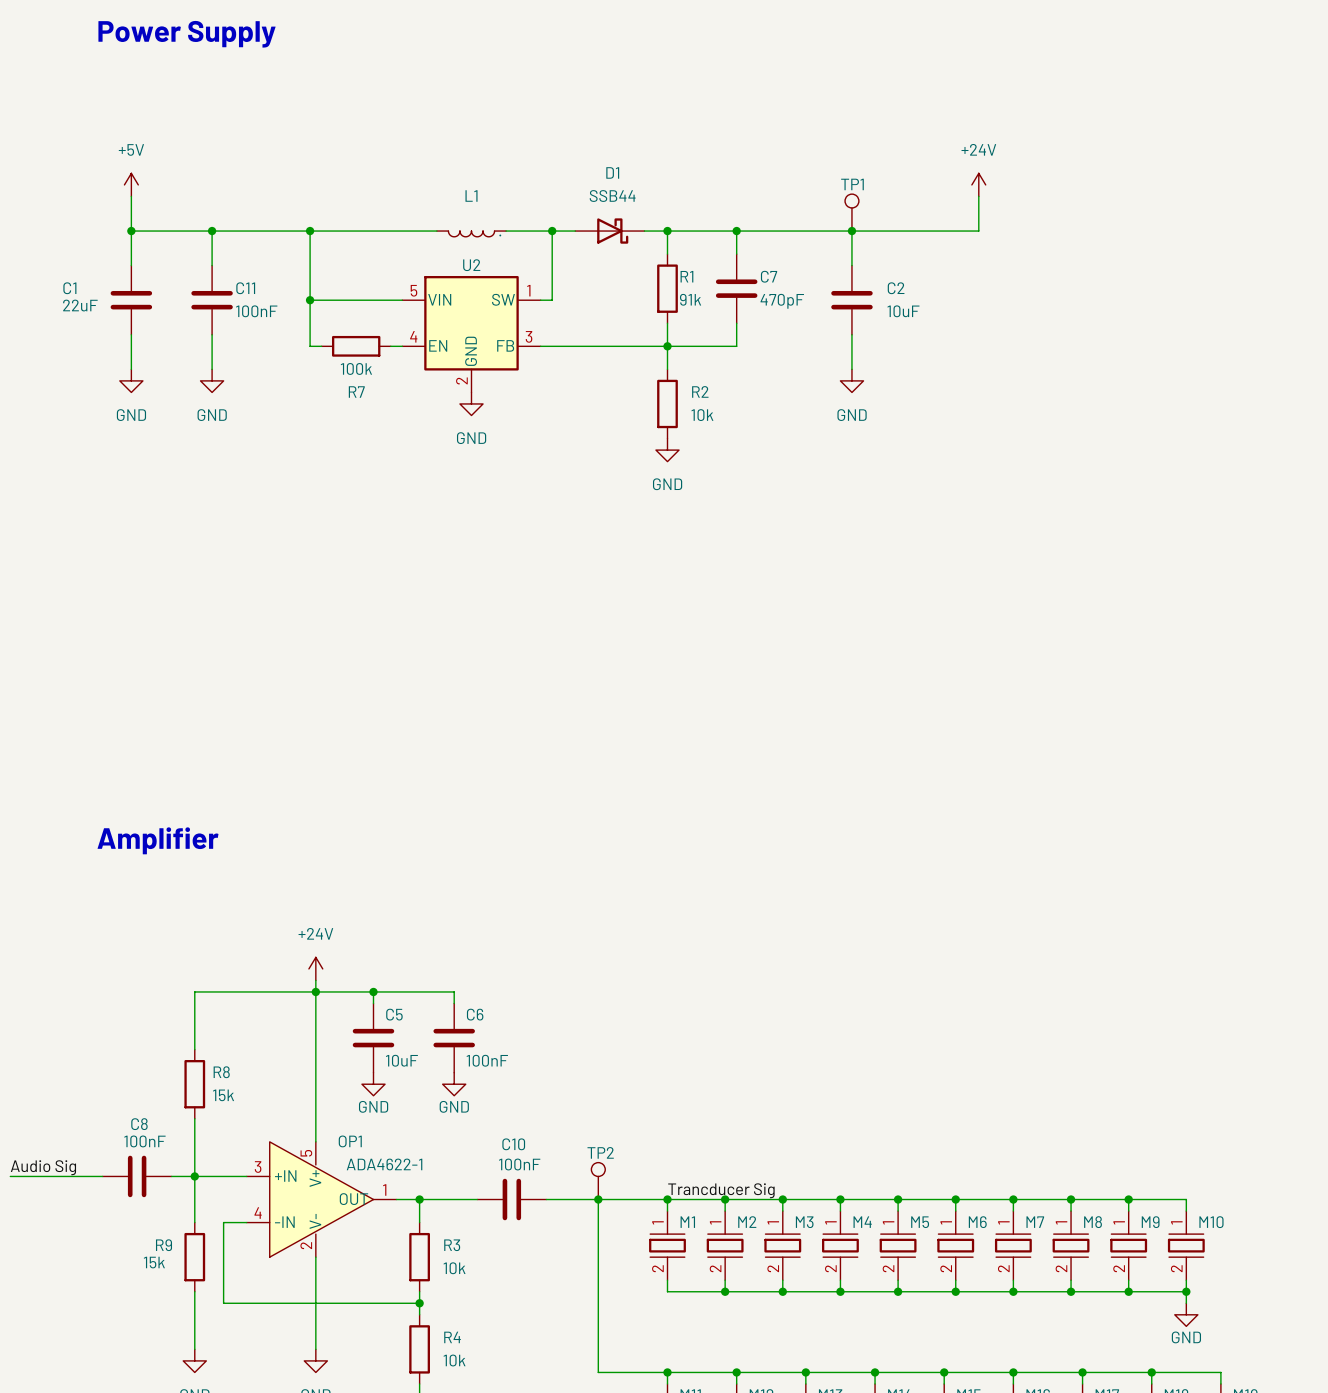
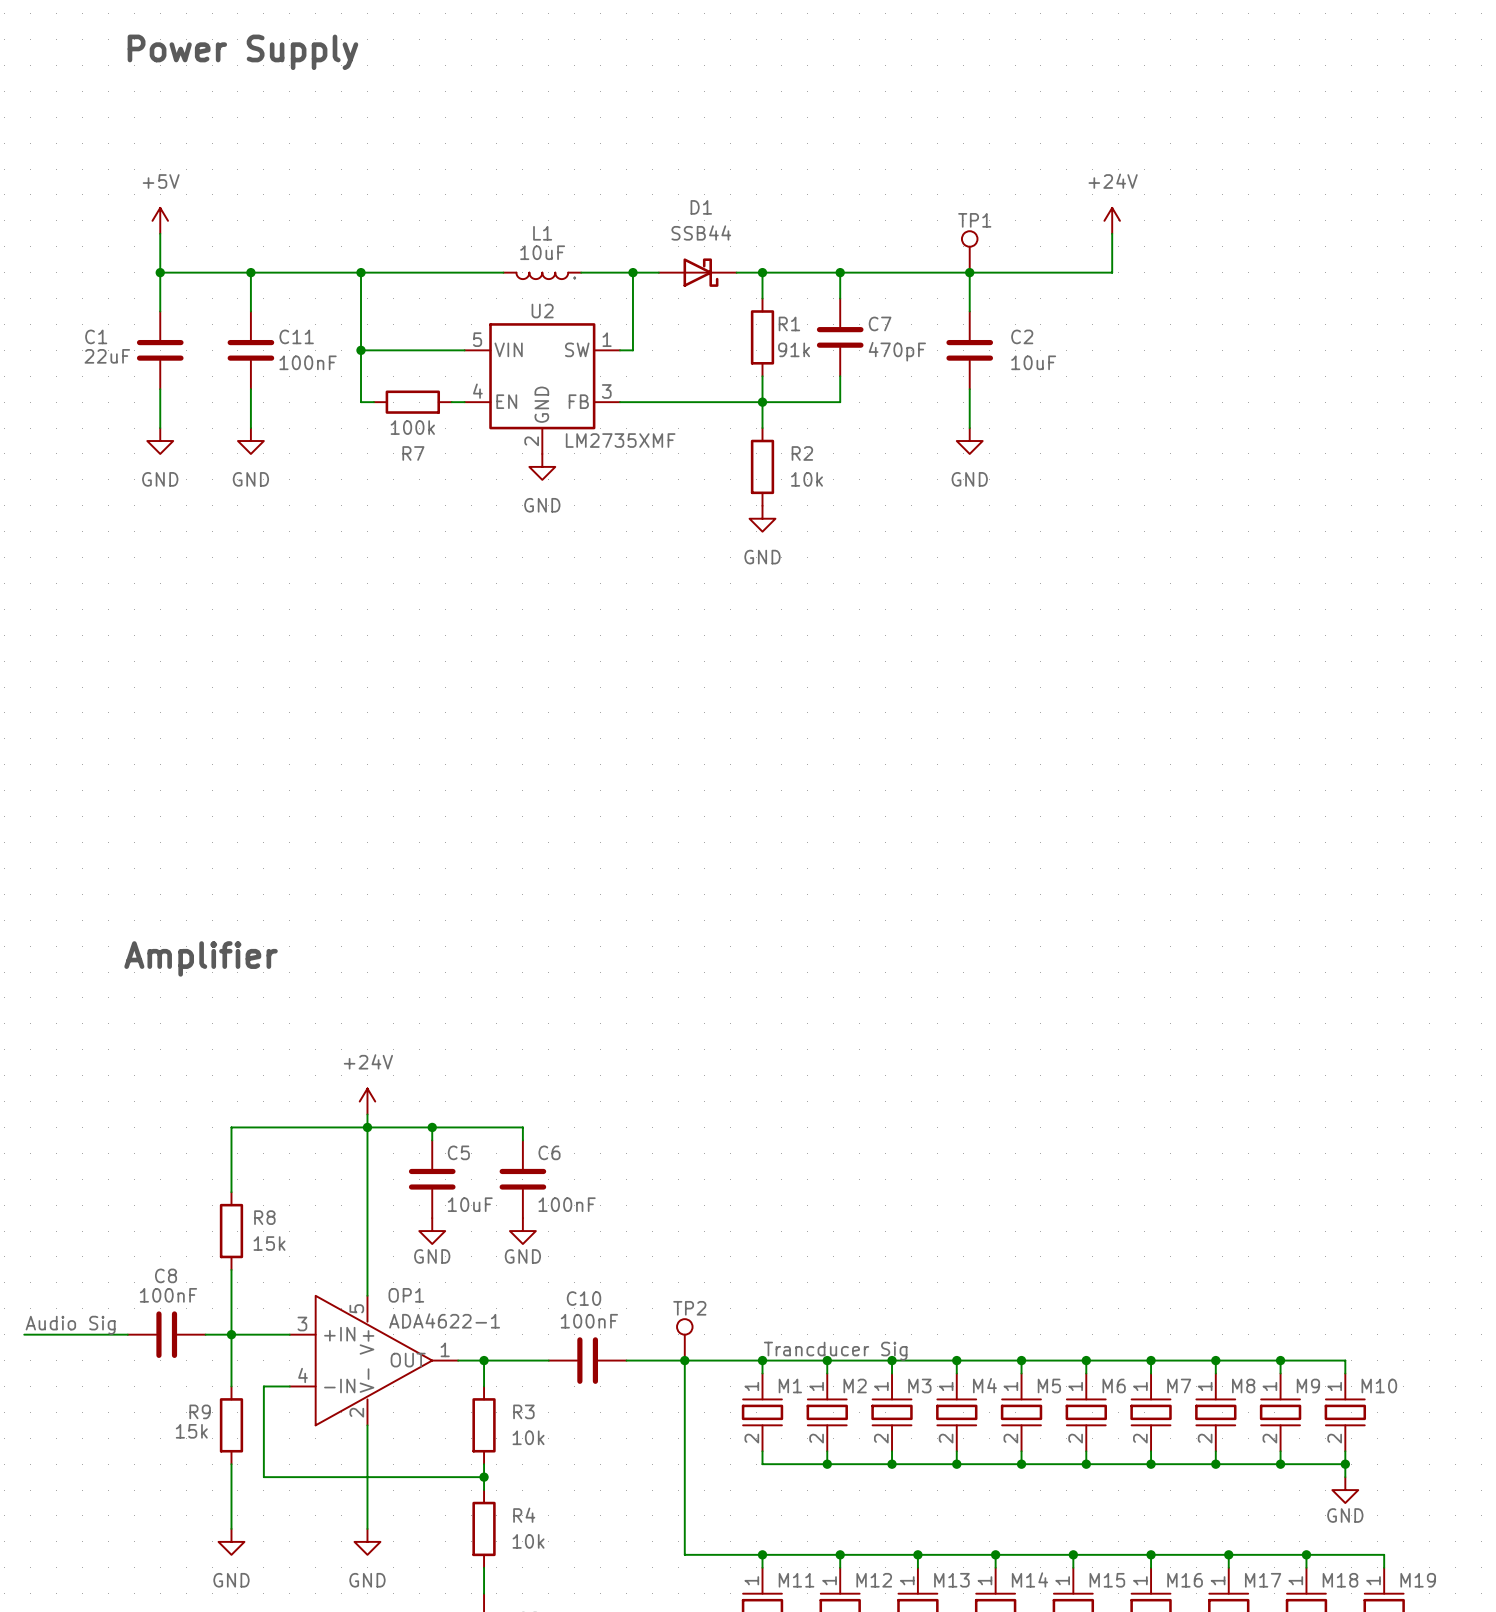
L1 value: none -> 10uF (542, 252)
U2 value: none -> LM2735XMF (620, 440)

